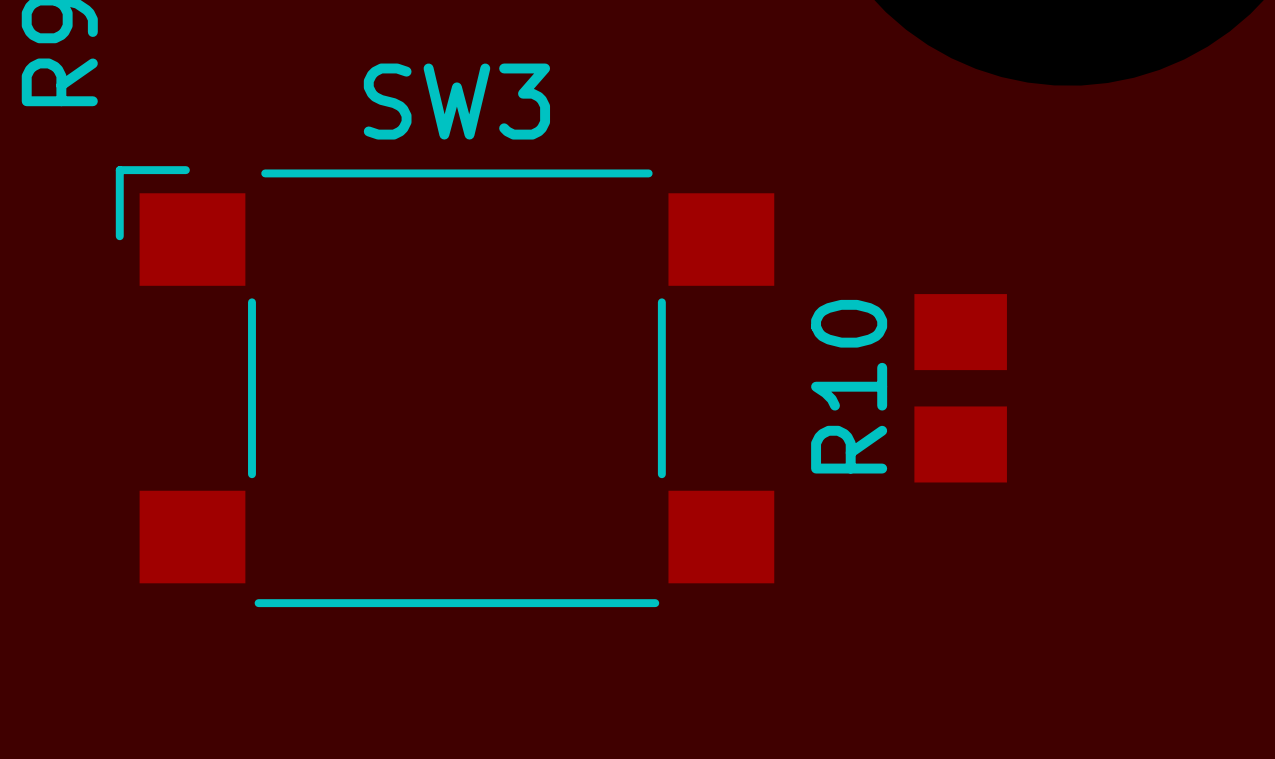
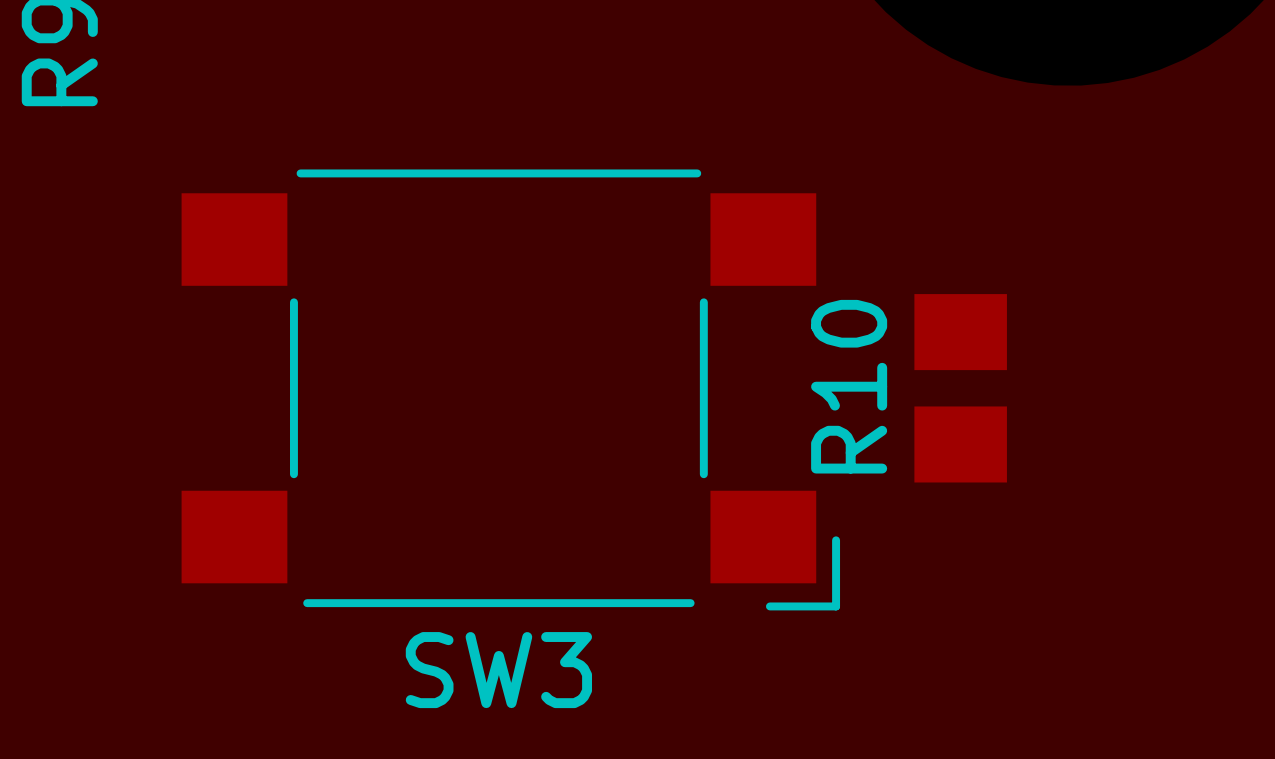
SW3 rotation: 0° (445, 386) -> 180° (510, 389)

